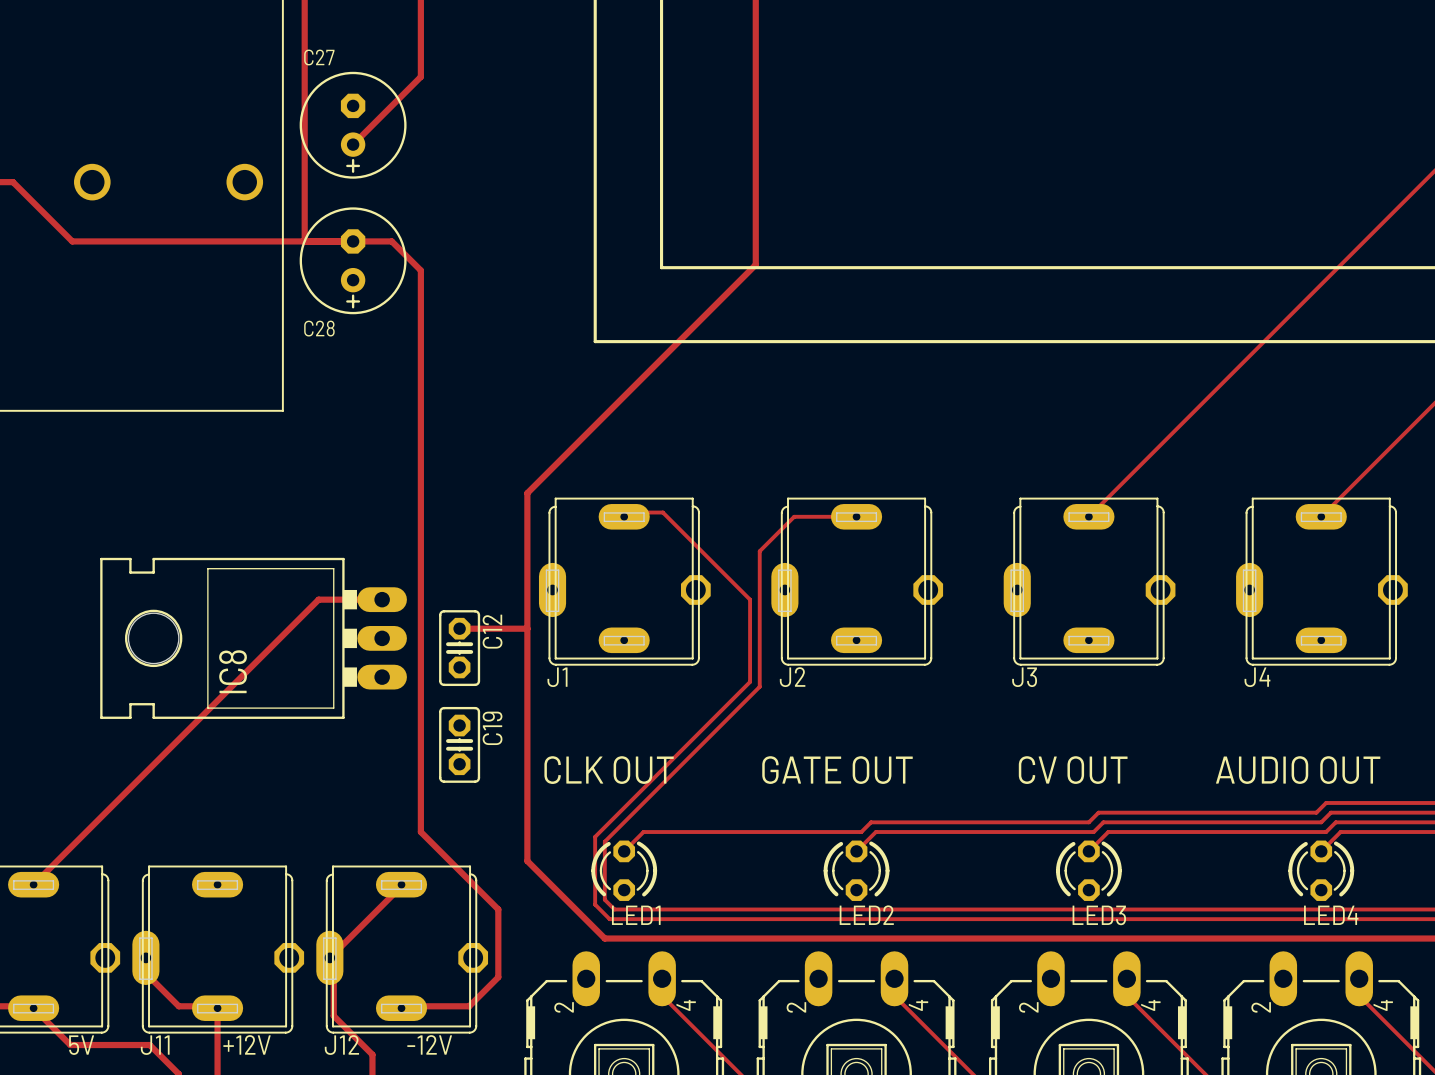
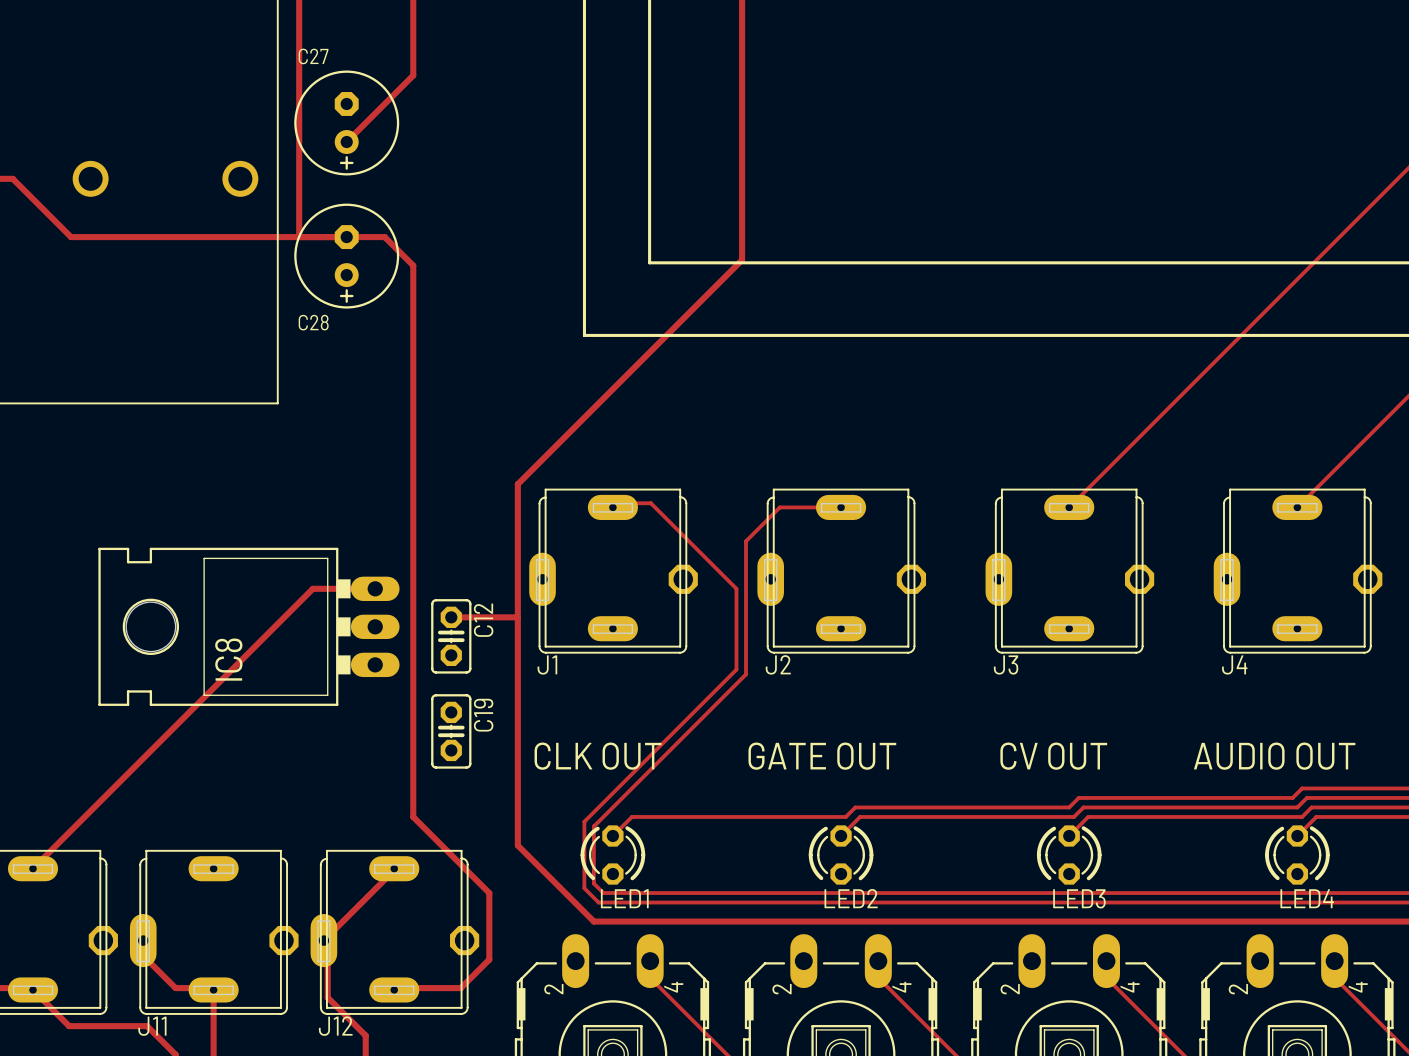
text: +12V (247, 1044) -> none
text: -12V (429, 1044) -> none
text: 5V (81, 1045) -> none

